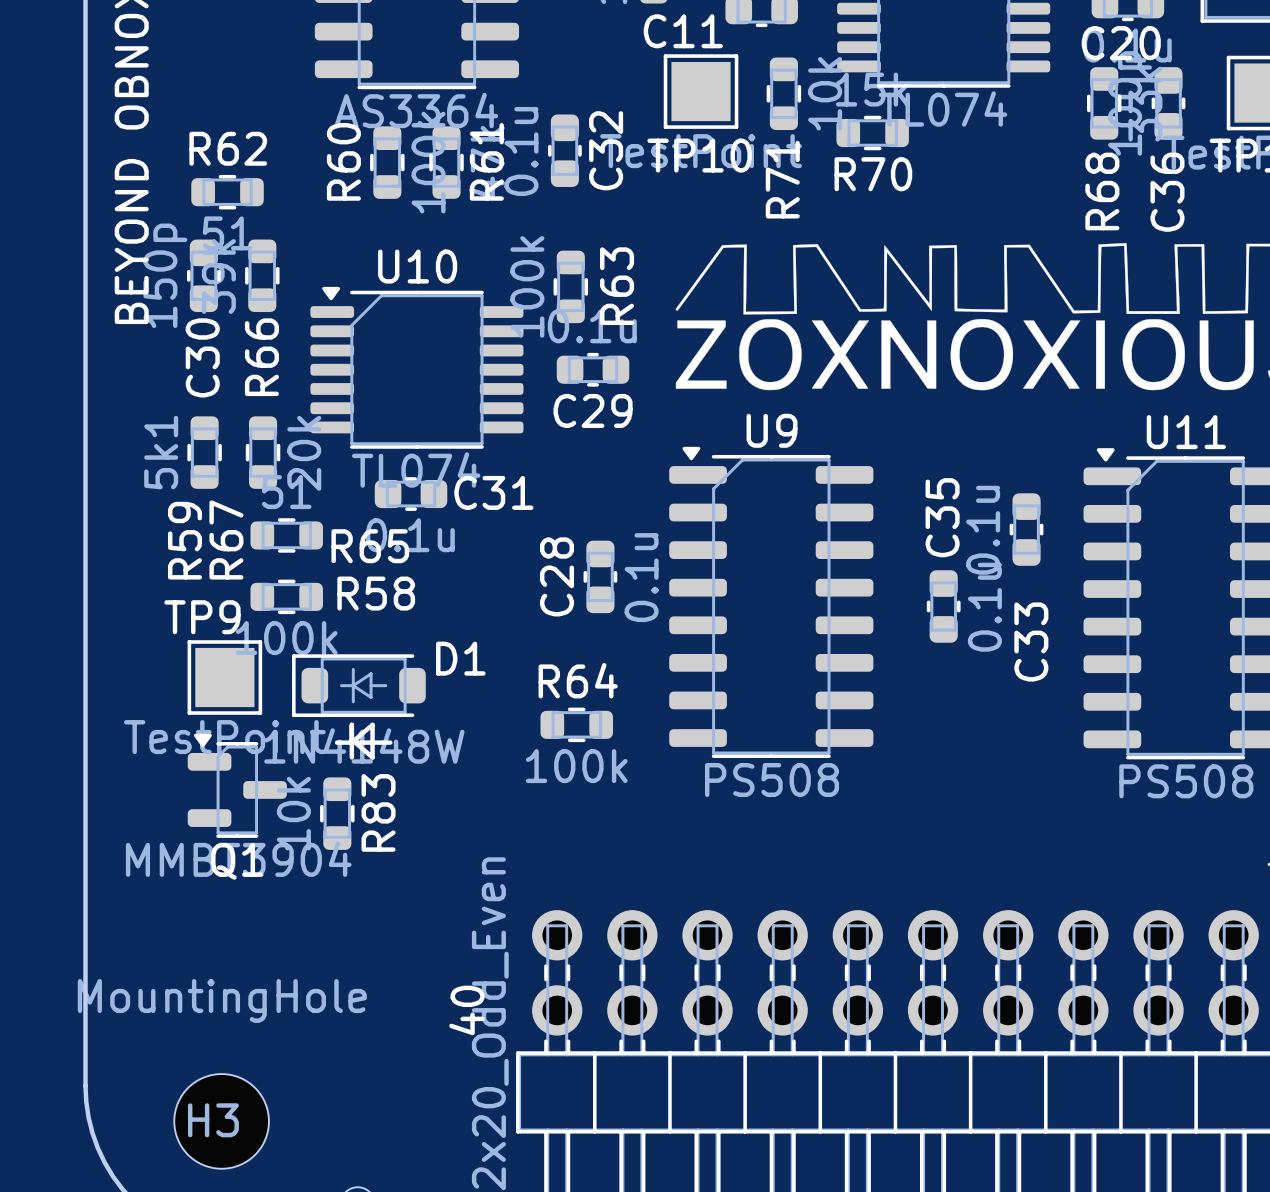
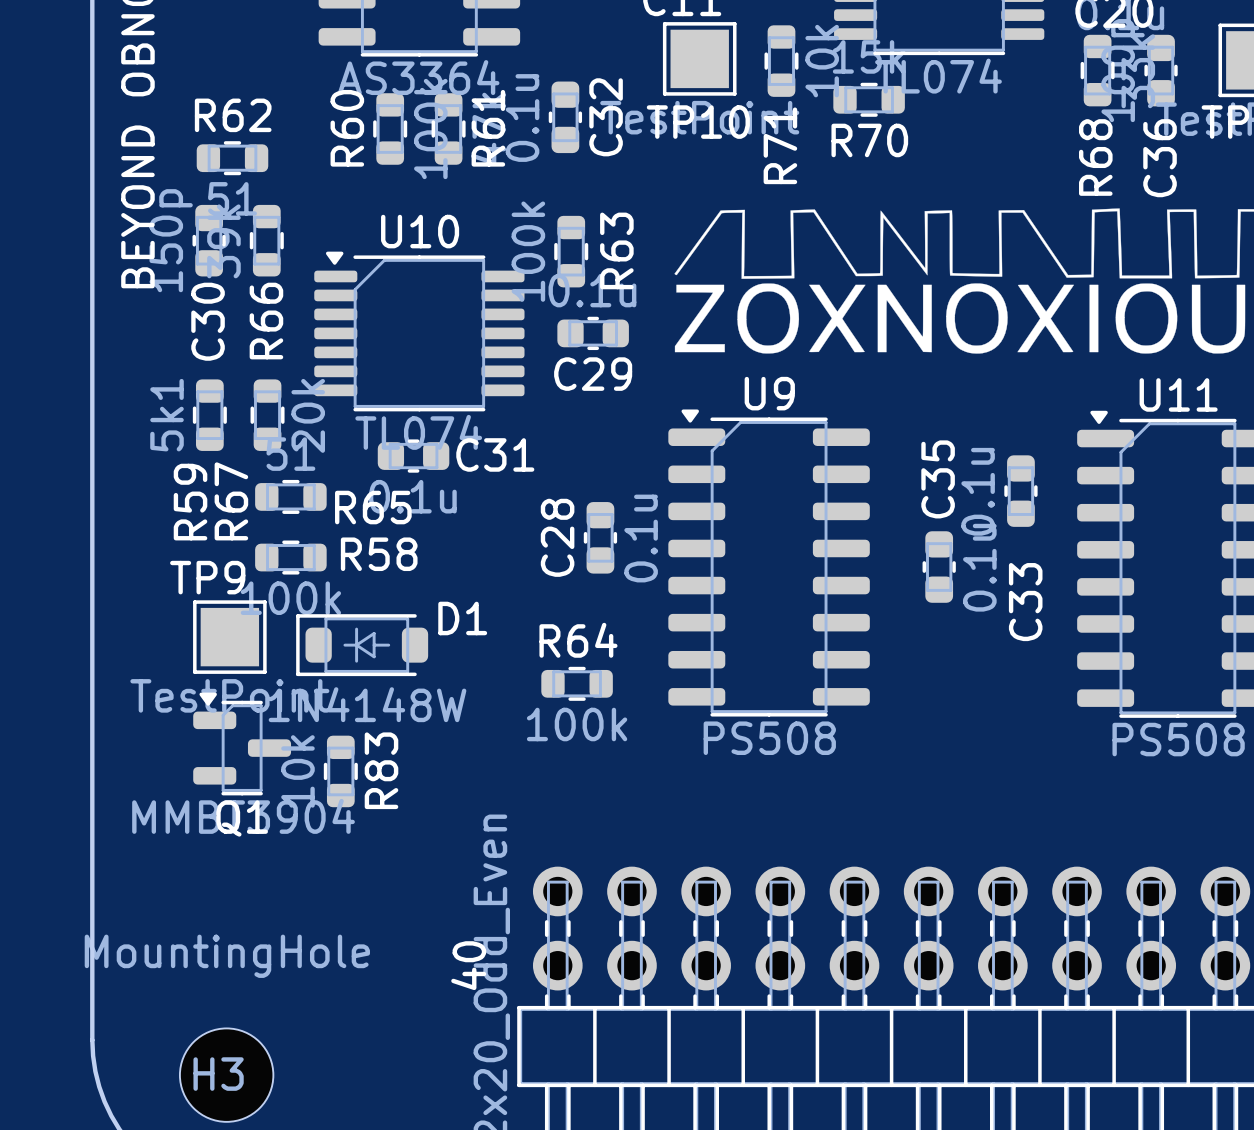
line: (351, 724) (351, 757) -> none
line: (351, 739) (372, 757) (372, 724) (351, 742) -> none
line: (337, 742) (390, 742) -> none

